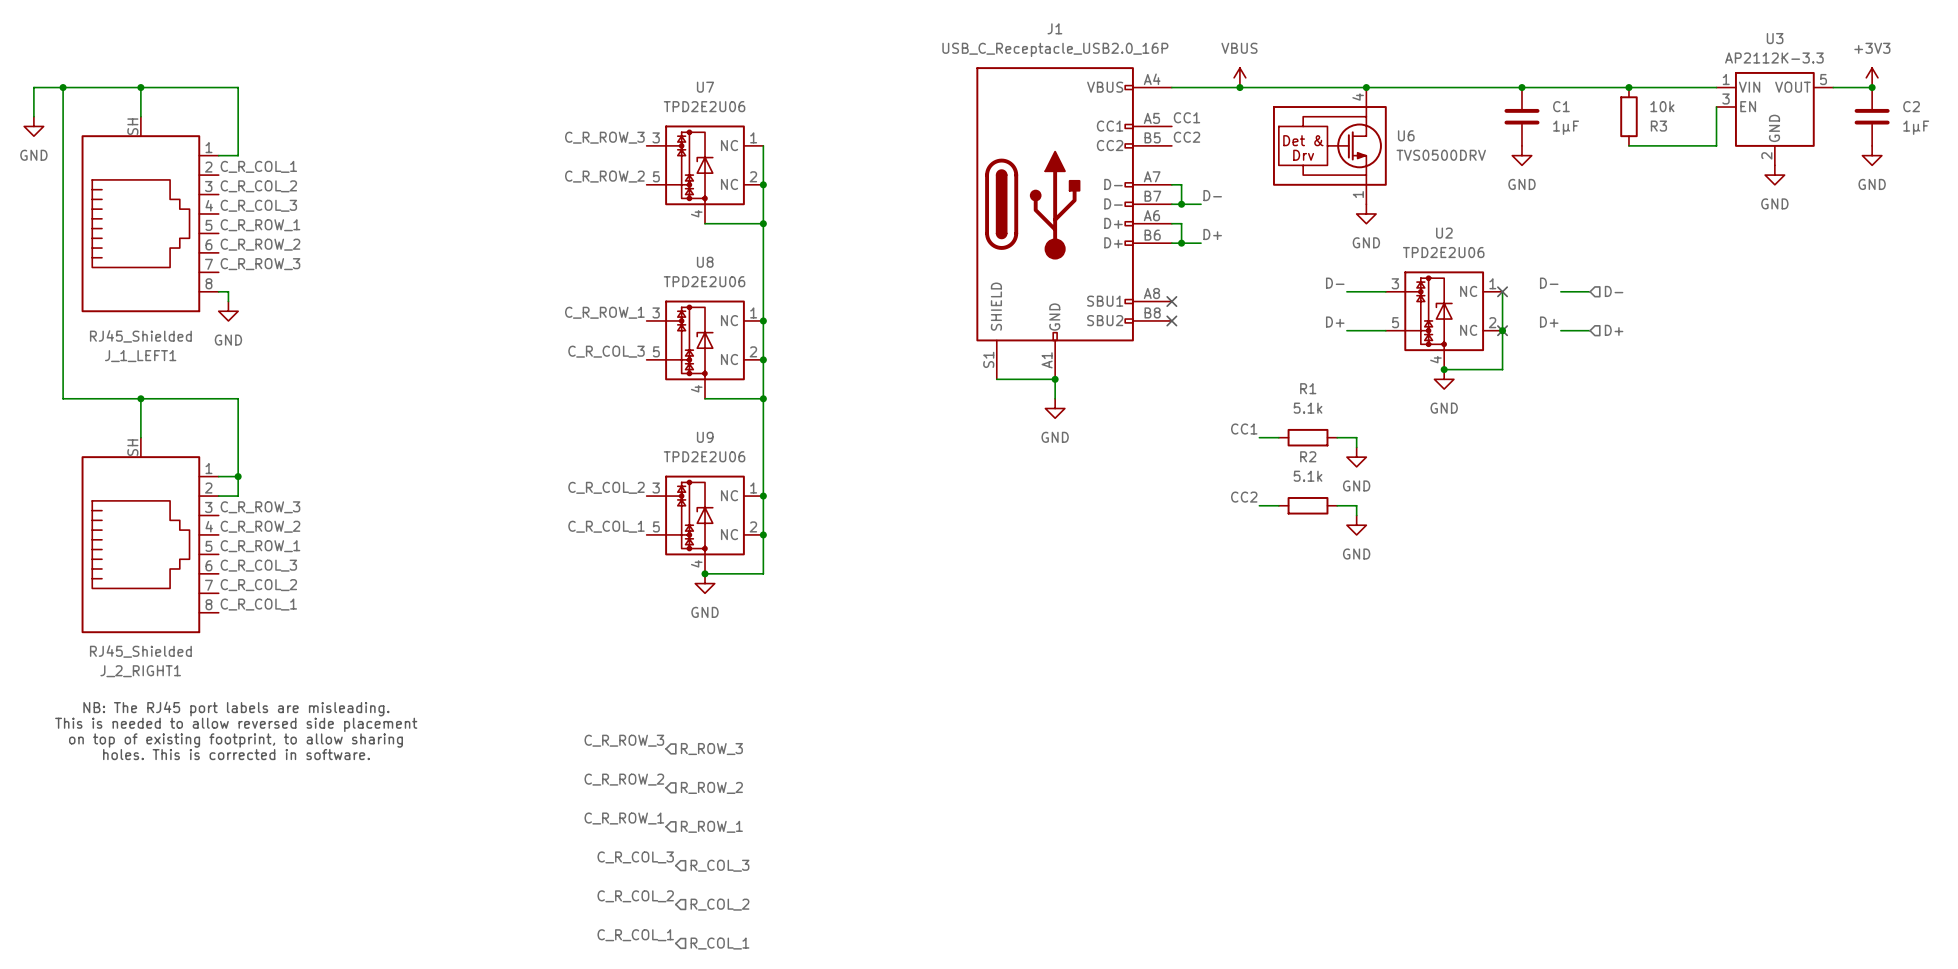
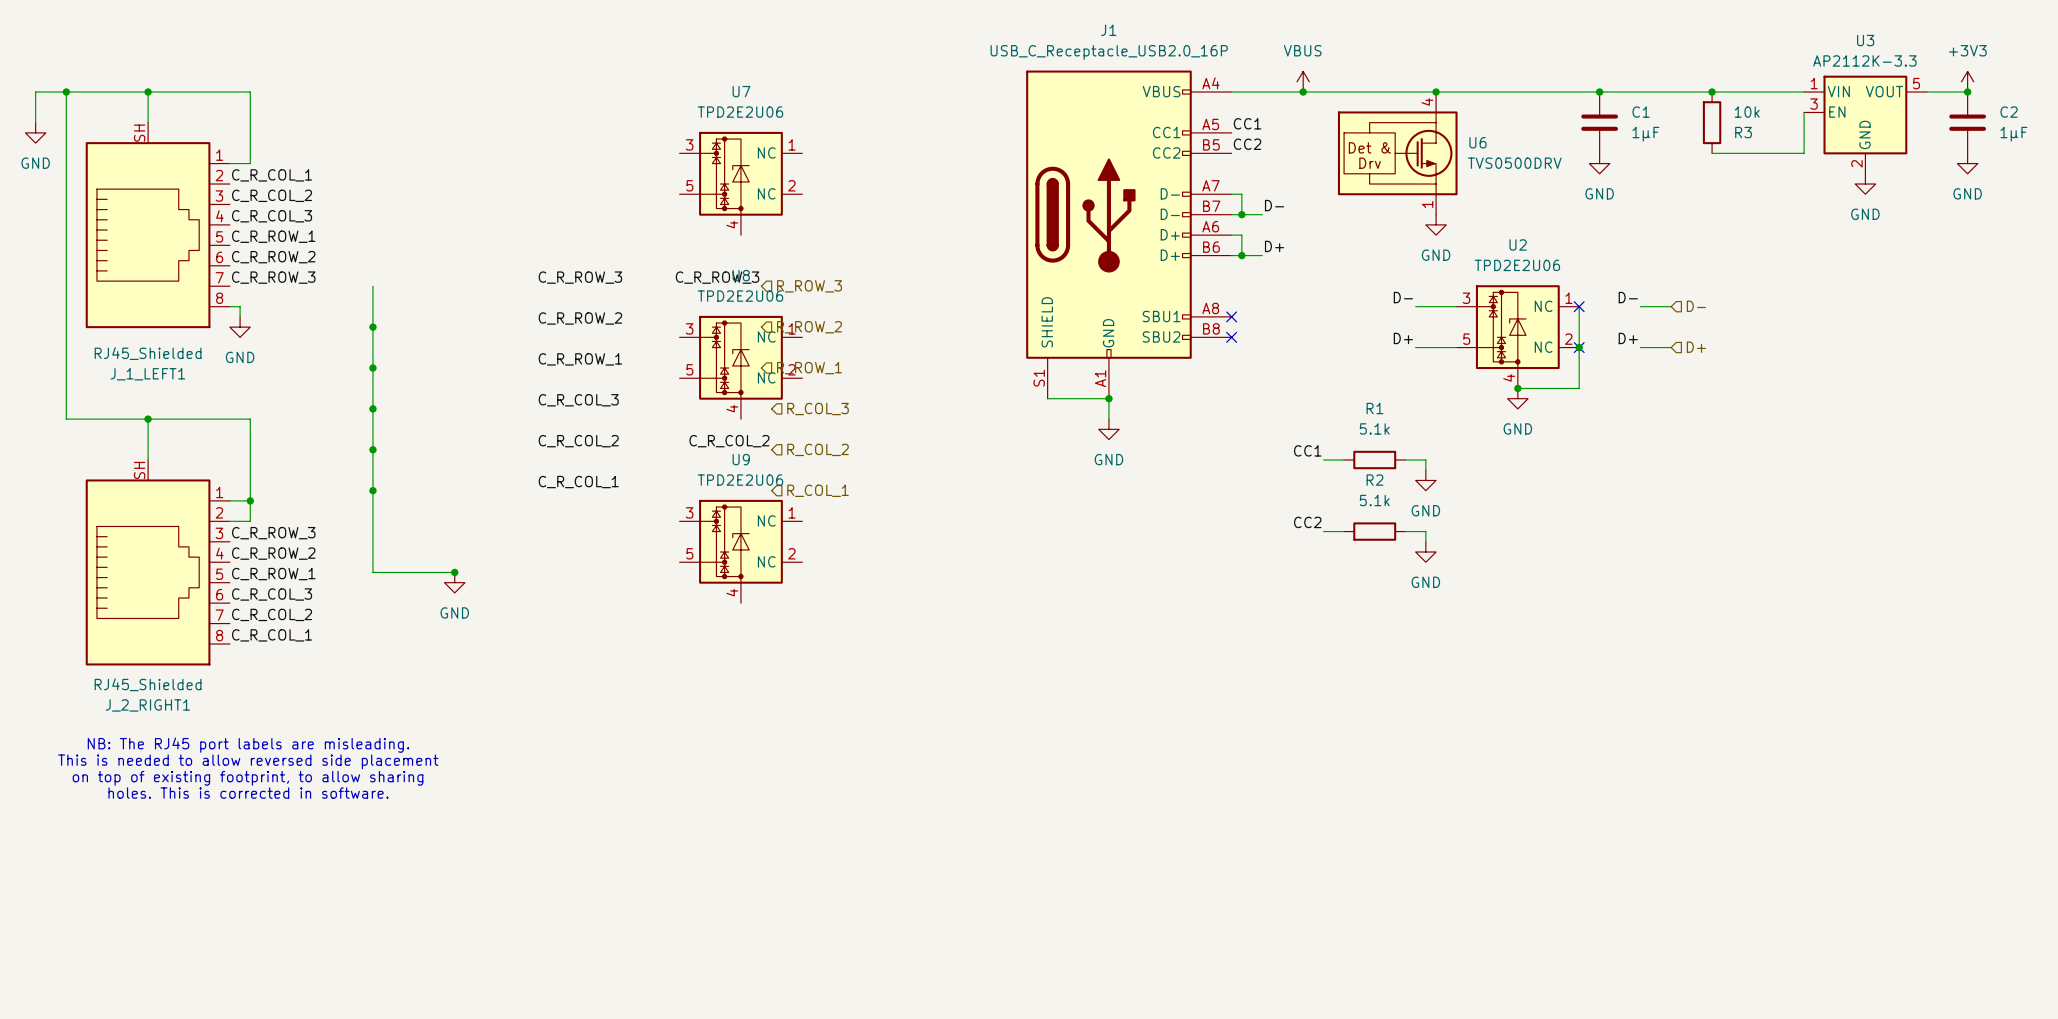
label: C_R_ROW_3 (604, 137) -> none
wire: (763, 145) (763, 573) (705, 573) -> none
label position: C_R_ROW_2 (604, 176) -> C_R_ROW_2 (580, 318)
junction: (763, 184) -> none
wire: (705, 223) (763, 223) -> none
junction: (763, 223) -> none
label: none -> C_R_ROW_3 (580, 277)
label: none -> C_R_ROW_3 (717, 277)
wire: none -> (372, 286) (372, 572) (454, 572)
hierarchical label: none -> R_ROW_3 (809, 286)
junction: none -> (372, 327)
hierarchical label: none -> R_ROW_2 (809, 327)
label position: C_R_ROW_1 (604, 312) -> C_R_ROW_1 (580, 359)
junction: (763, 320) -> none
junction: none -> (372, 368)
hierarchical label: none -> R_ROW_1 (809, 368)
label position: C_R_COL_3 (606, 351) -> C_R_COL_3 (578, 400)
junction: (763, 359) -> none
junction: none -> (372, 408)
hierarchical label: none -> R_COL_3 (818, 409)
wire: (705, 398) (763, 398) -> none
junction: (763, 398) -> none
label: none -> C_R_COL_2 (578, 441)
label: none -> C_R_COL_2 (729, 441)
junction: none -> (372, 449)
hierarchical label: none -> R_COL_2 (818, 449)
junction: none -> (372, 490)
hierarchical label: none -> R_COL_1 (818, 490)
label: C_R_COL_2 (606, 487) -> none
junction: (763, 496) -> none
label position: C_R_COL_1 (606, 526) -> C_R_COL_1 (578, 482)
junction: (763, 534) -> none
junction: none -> (454, 572)
power symbol: none -> GND (454, 582)
junction: (705, 573) -> none
power symbol: GND (705, 583) -> none
label: C_R_ROW_3 (624, 740) -> none
hierarchical label: R_ROW_3 (711, 749) -> none
label: C_R_ROW_2 (624, 779) -> none
hierarchical label: R_ROW_2 (711, 787) -> none
label: C_R_ROW_1 (624, 818) -> none
hierarchical label: R_ROW_1 (711, 826) -> none
label: C_R_COL_3 (635, 857) -> none
hierarchical label: R_COL_3 (719, 865) -> none
label: C_R_COL_2 (635, 896) -> none
hierarchical label: R_COL_2 (719, 904) -> none
label: C_R_COL_1 (635, 935) -> none
hierarchical label: R_COL_1 (719, 943) -> none

